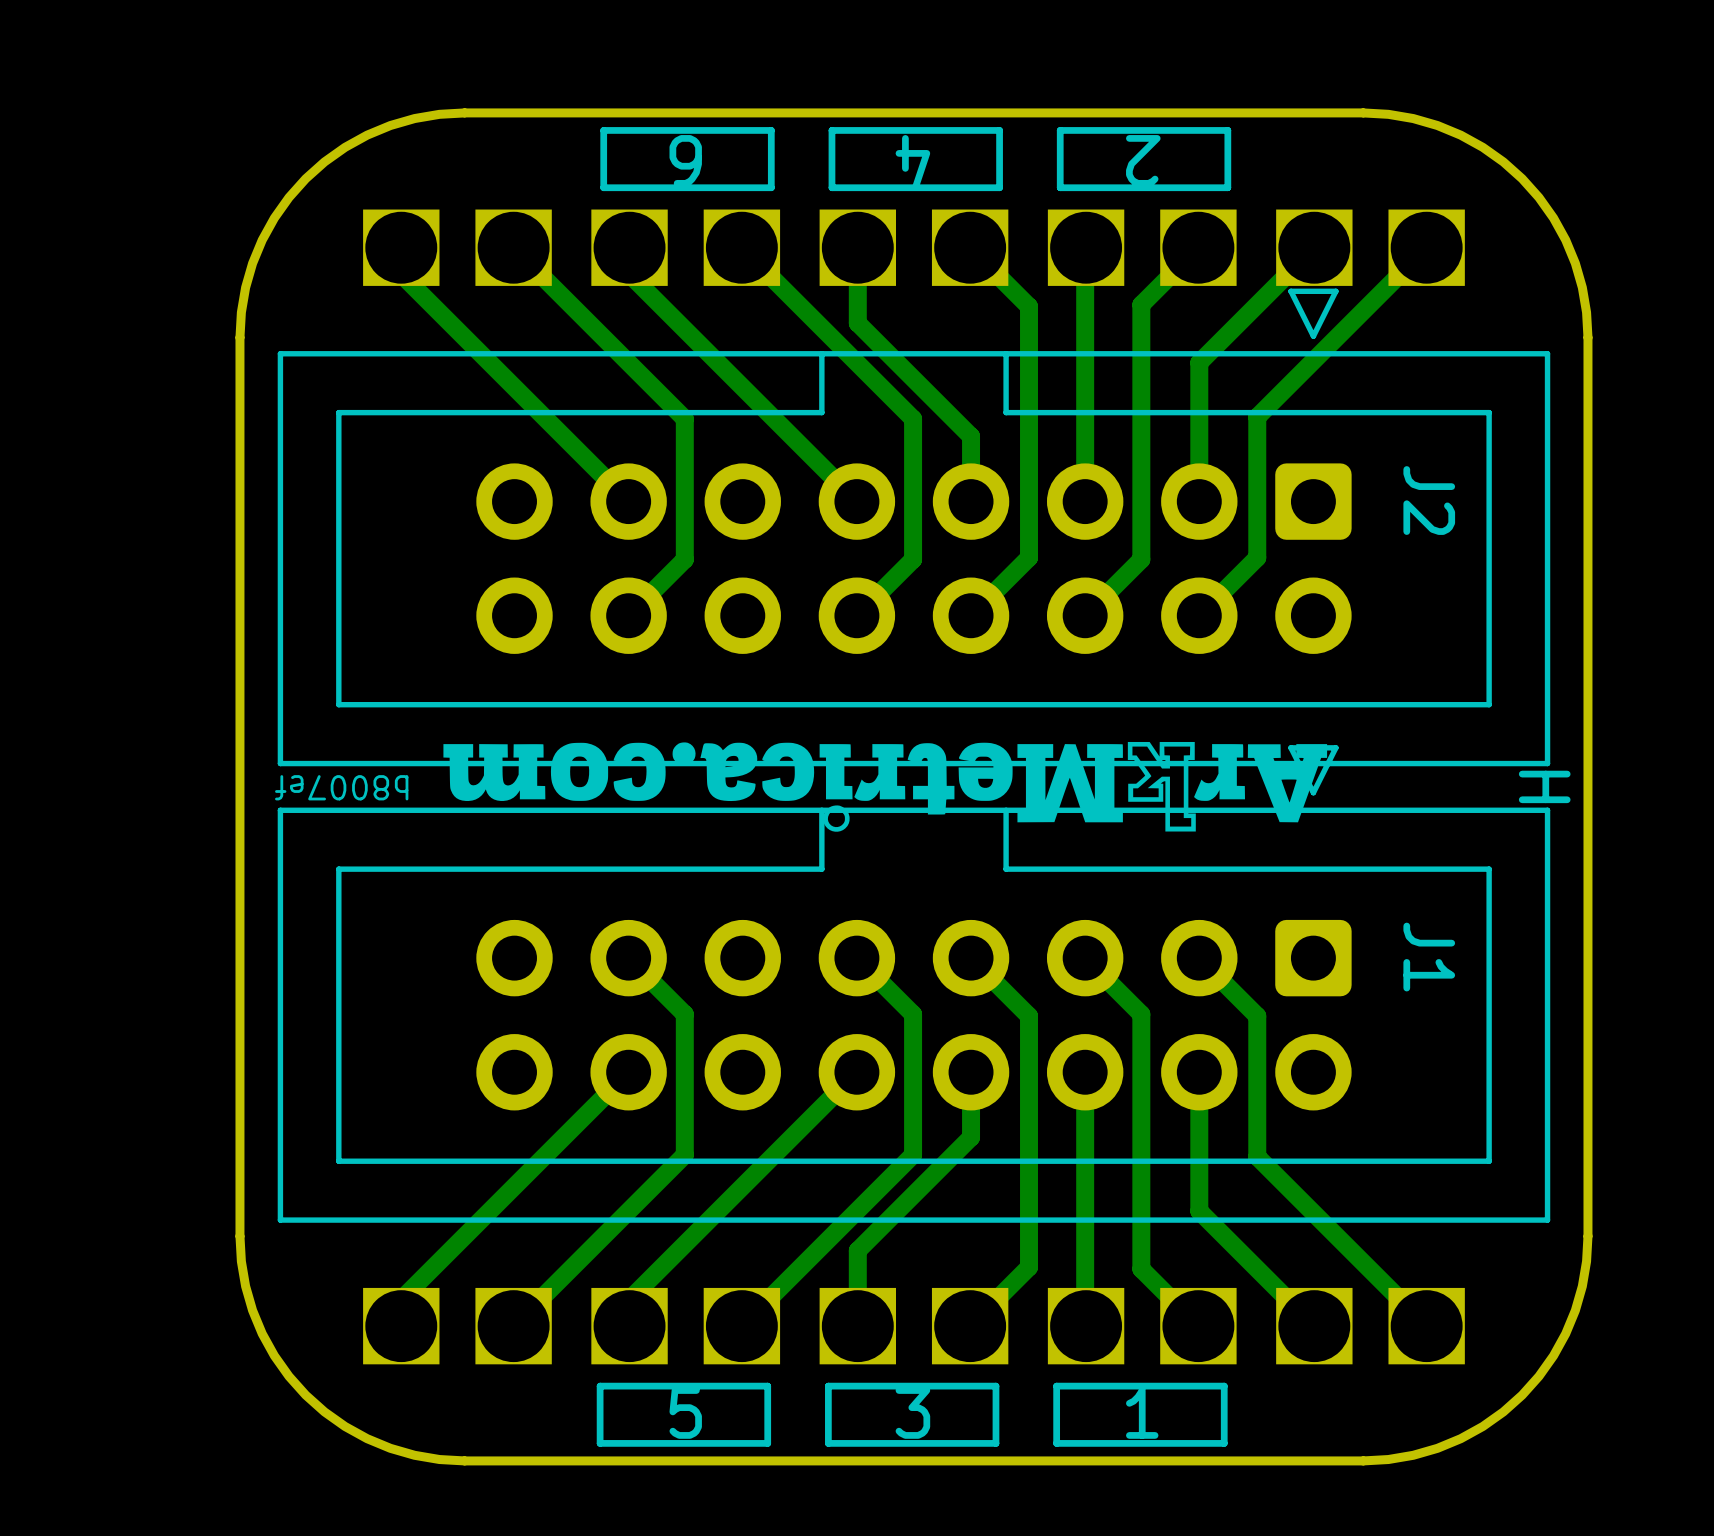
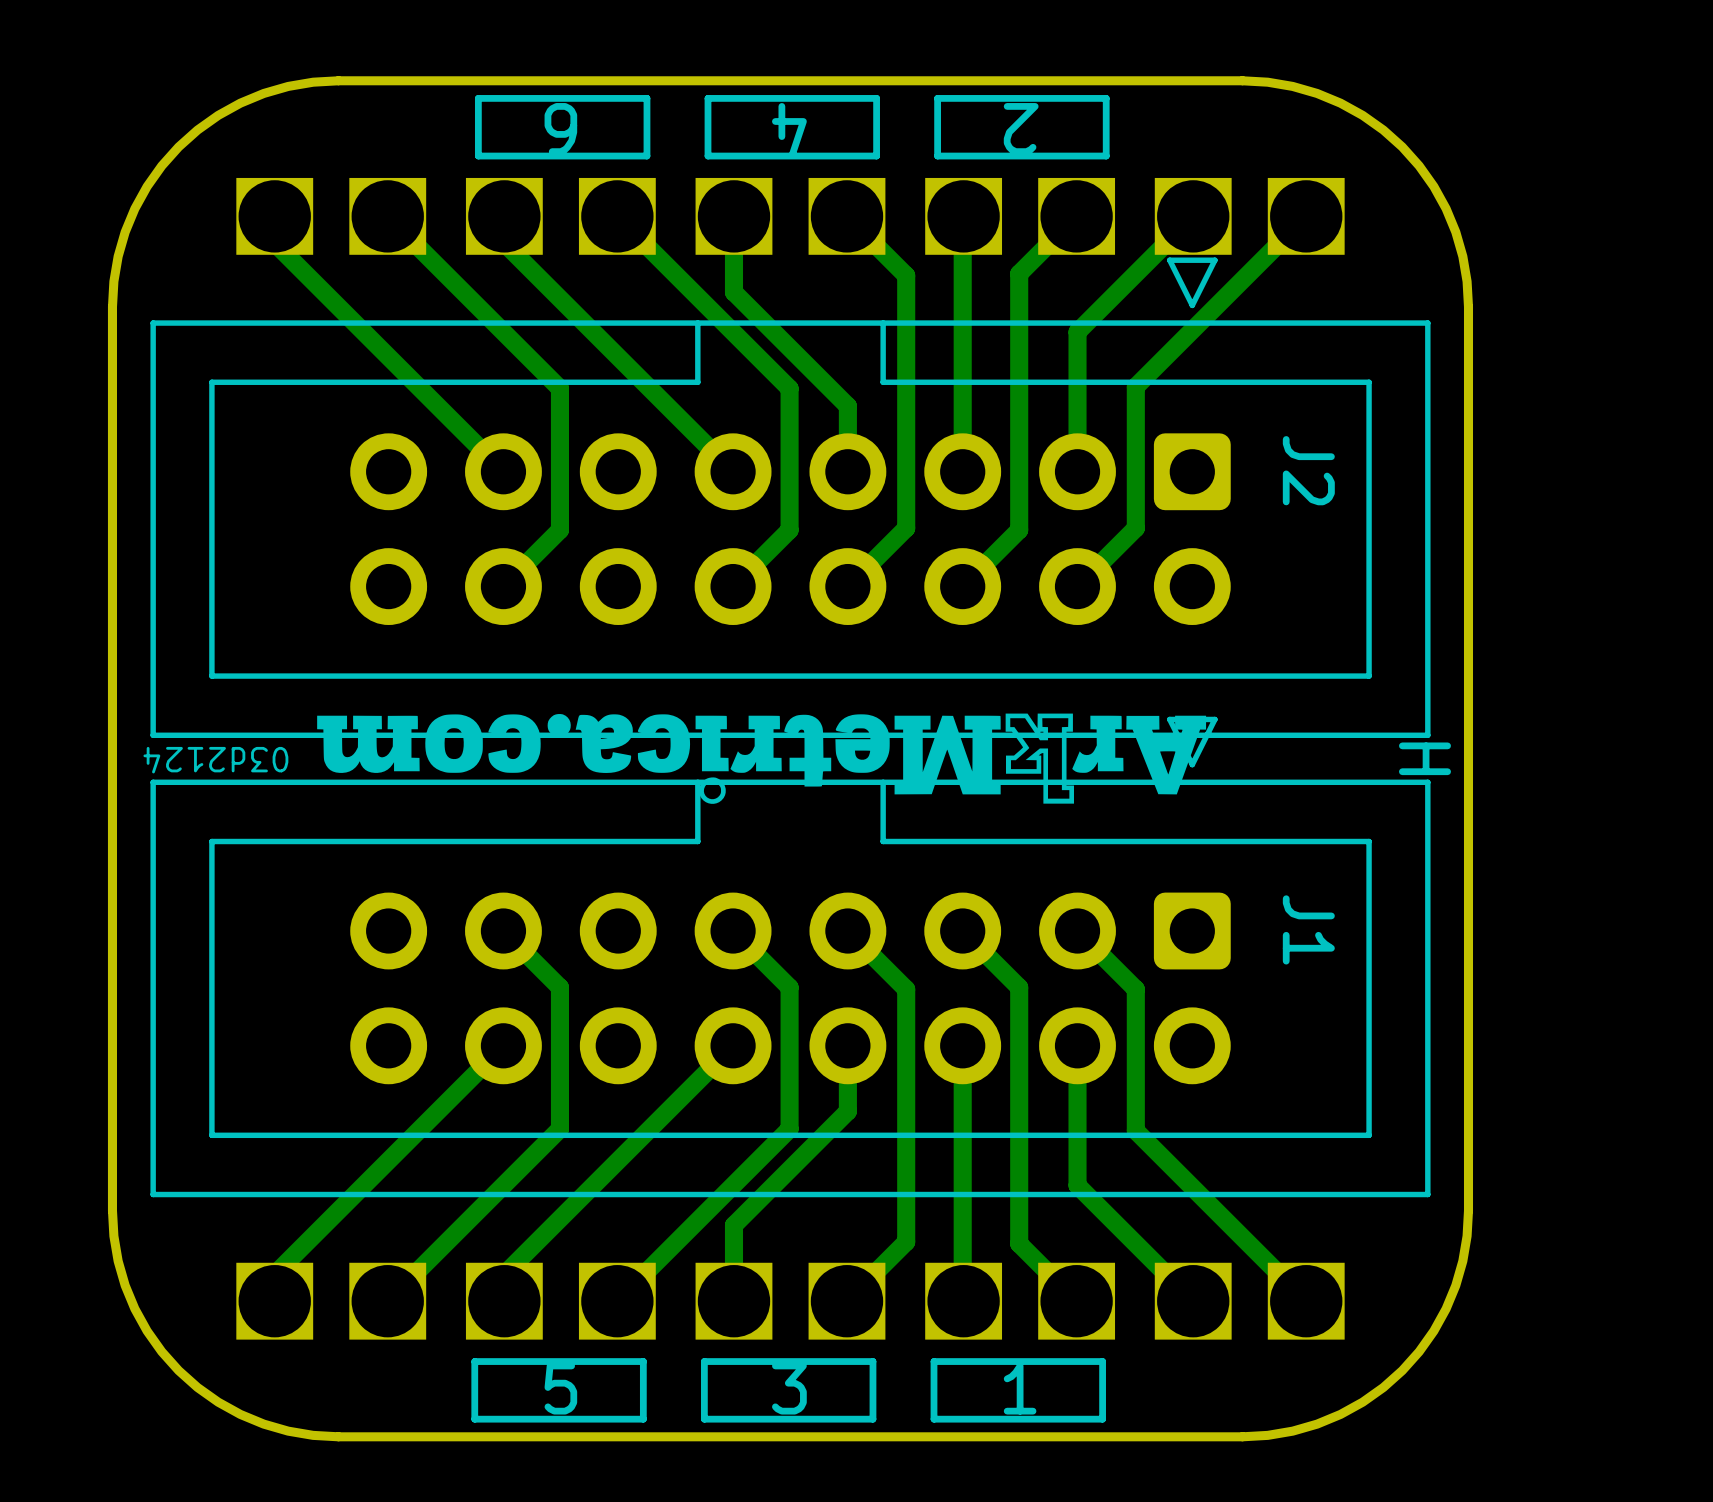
text: b8007ef (341, 787) -> 03d2124 (215, 760)

